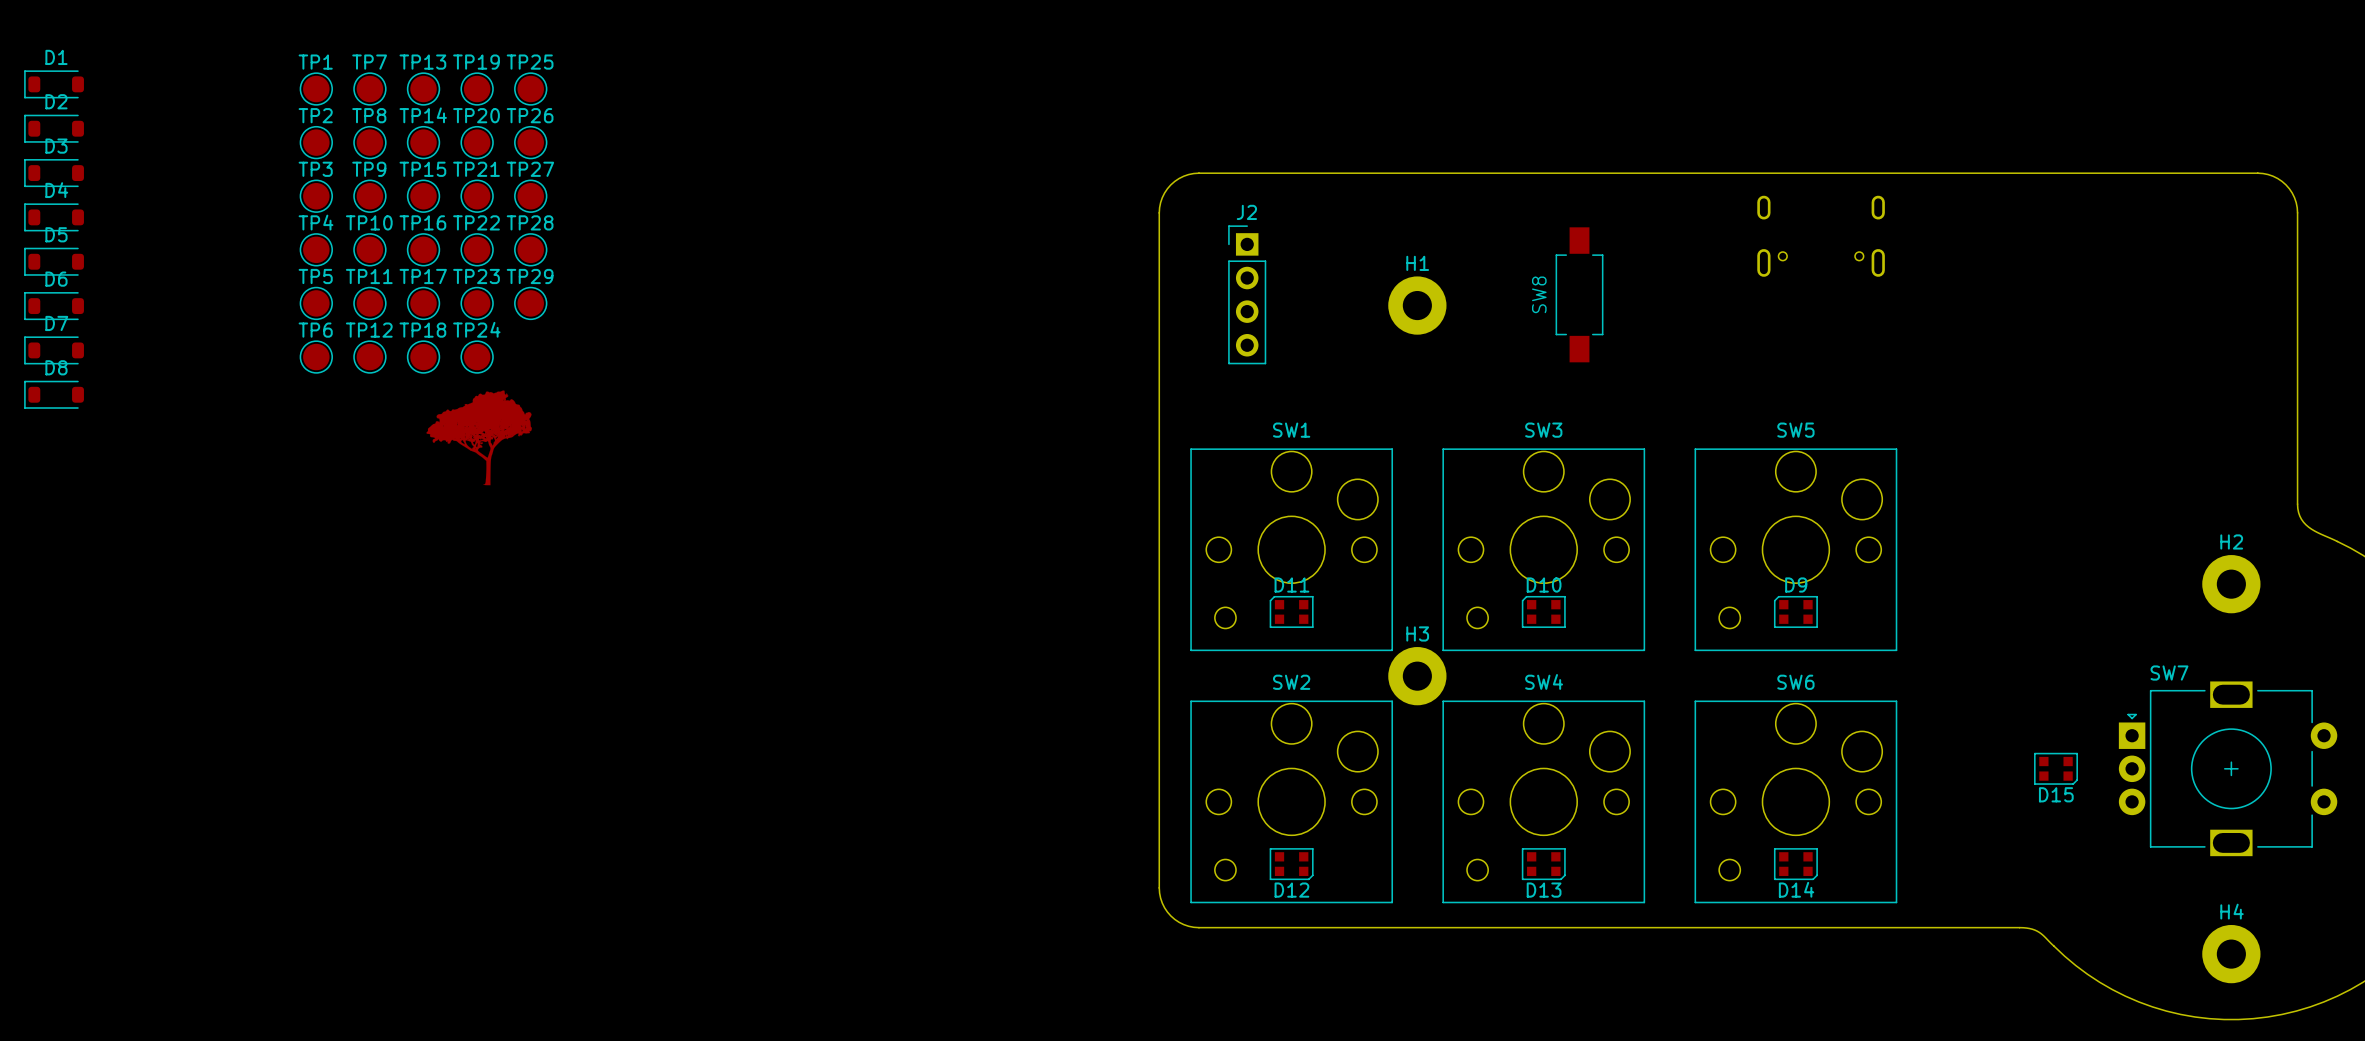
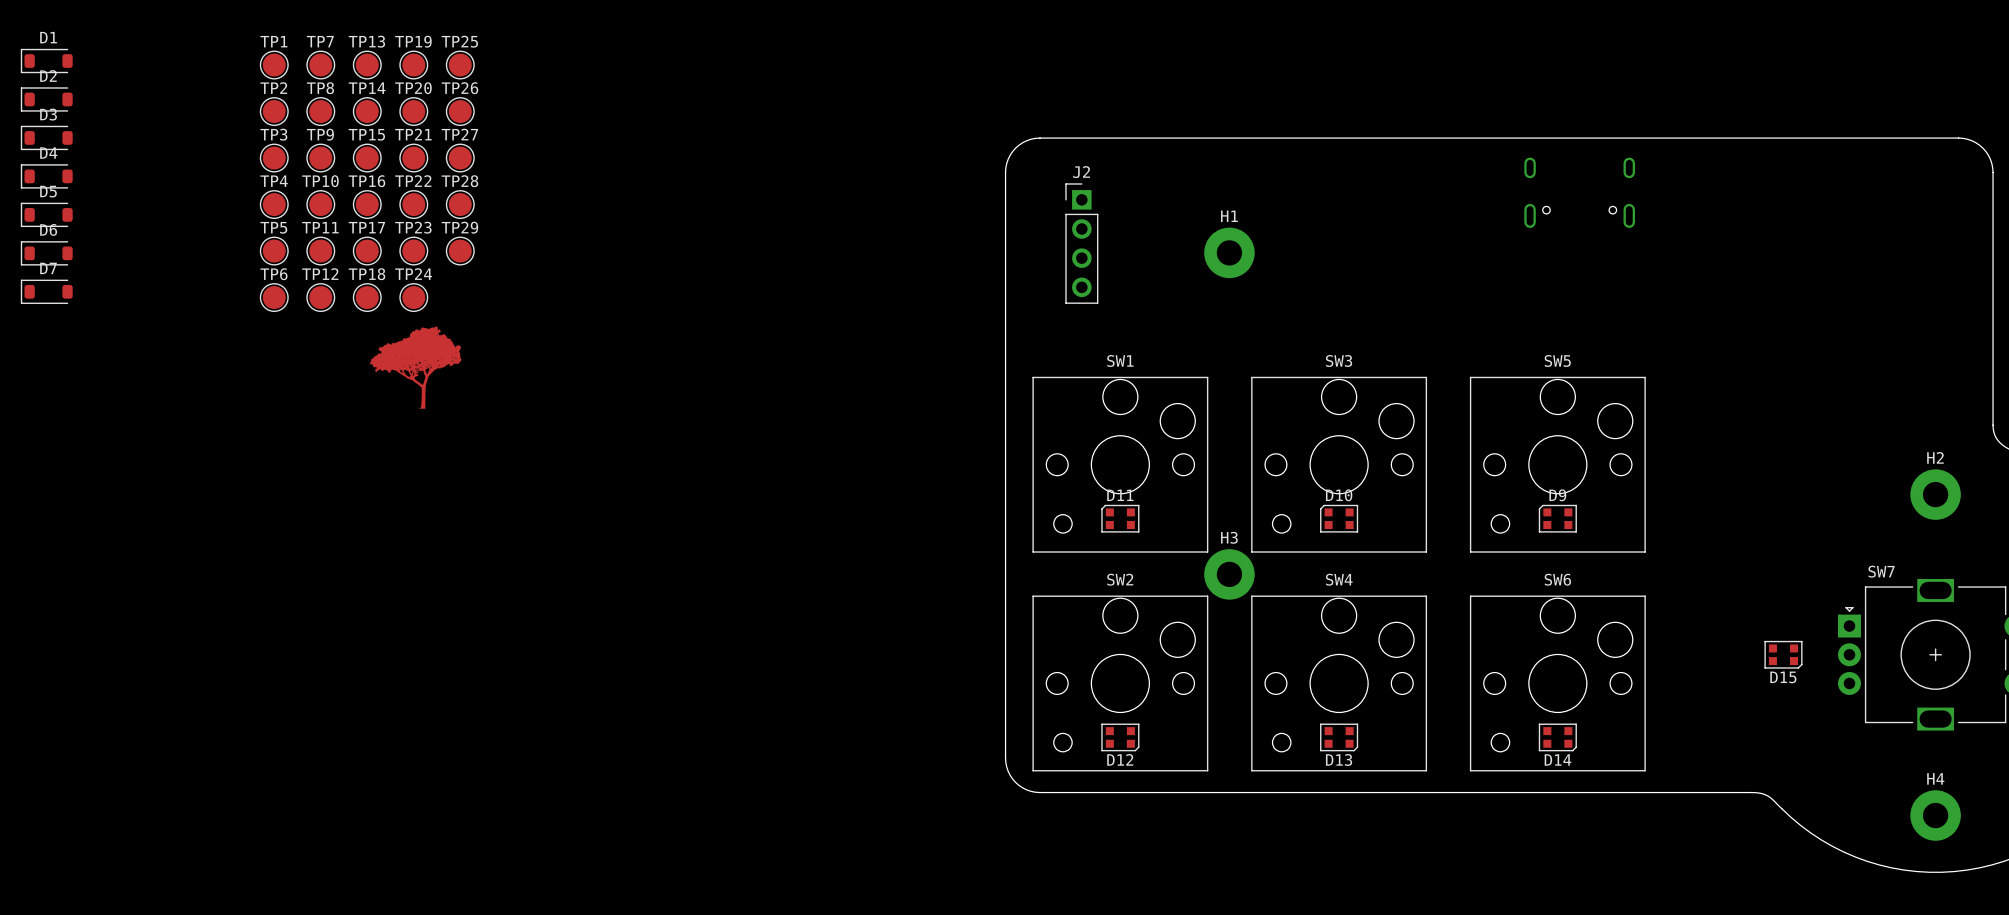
SW8: (1579, 294) -> none
D8: (54, 394) -> none

